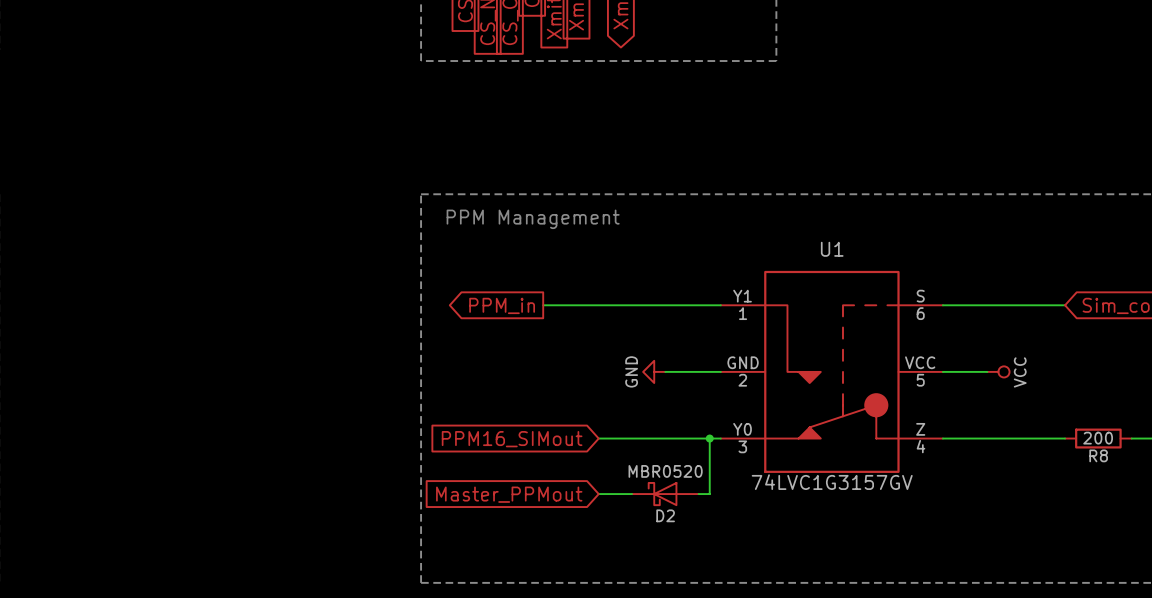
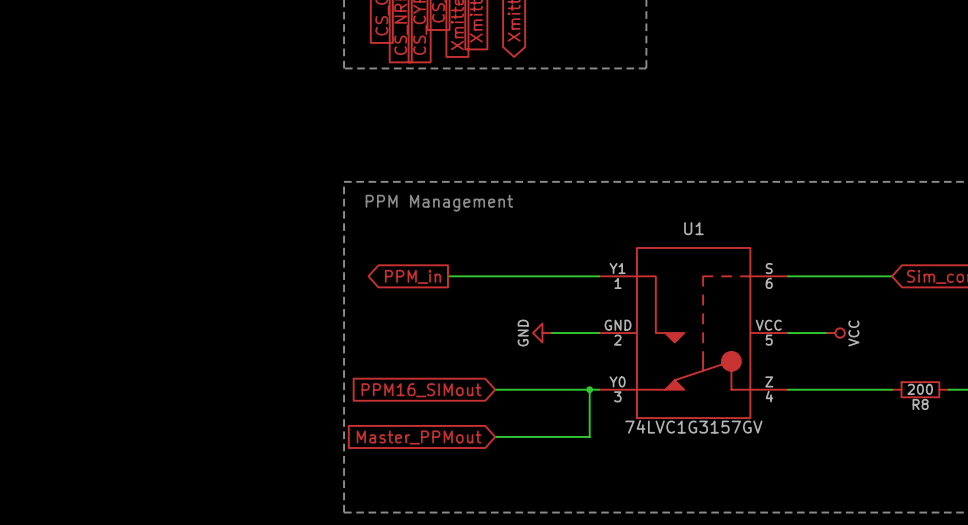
D2: MBR0520 (665, 494) -> none

